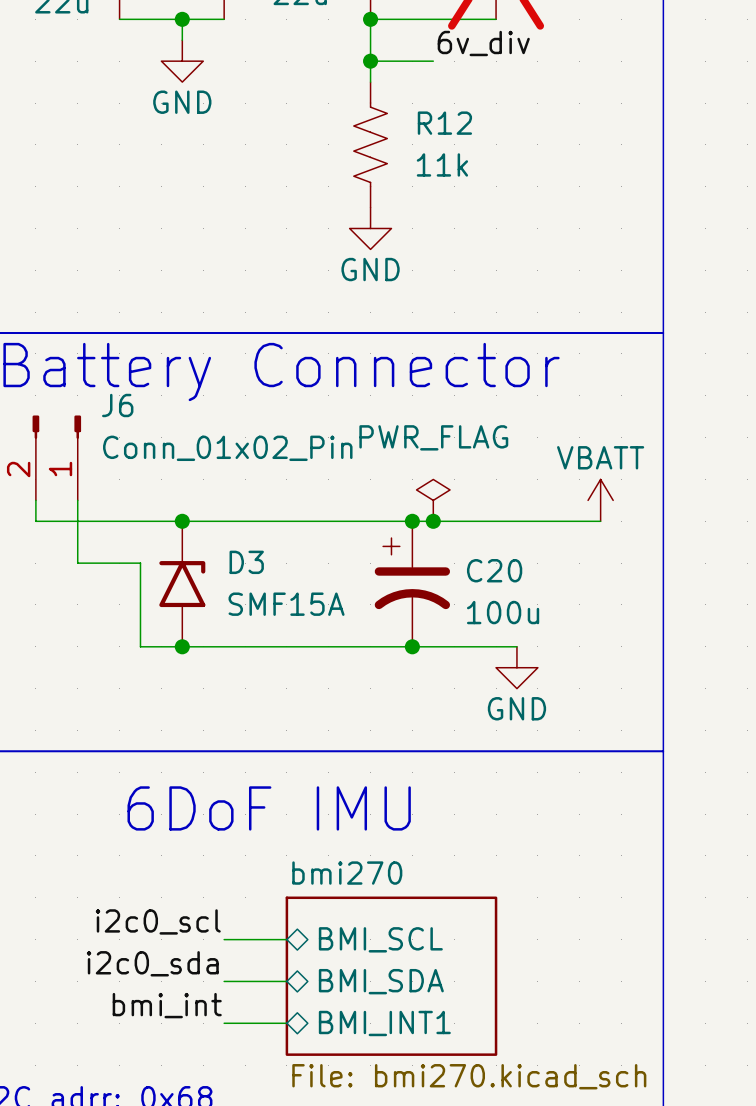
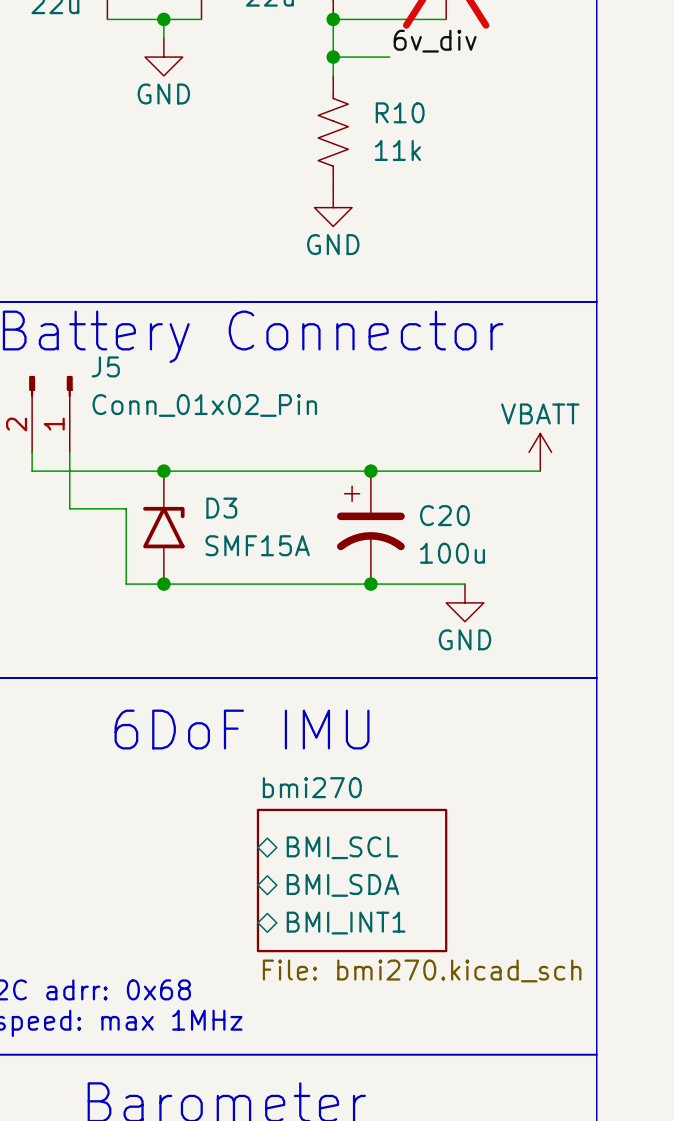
R12 name: R12 (444, 123) -> R10 (400, 112)
J6 name: J6 (117, 405) -> J5 (105, 366)
power symbol: PWR_FLAG (433, 500) -> none
junction: (433, 521) -> none
label: i2c0_scl (158, 921) -> none
wire: (224, 939) (286, 939) -> none
label: i2c0_sda (152, 963) -> none
wire: (224, 981) (286, 981) -> none
label: bmi_int (167, 1005) -> none
wire: (224, 1023) (286, 1023) -> none

